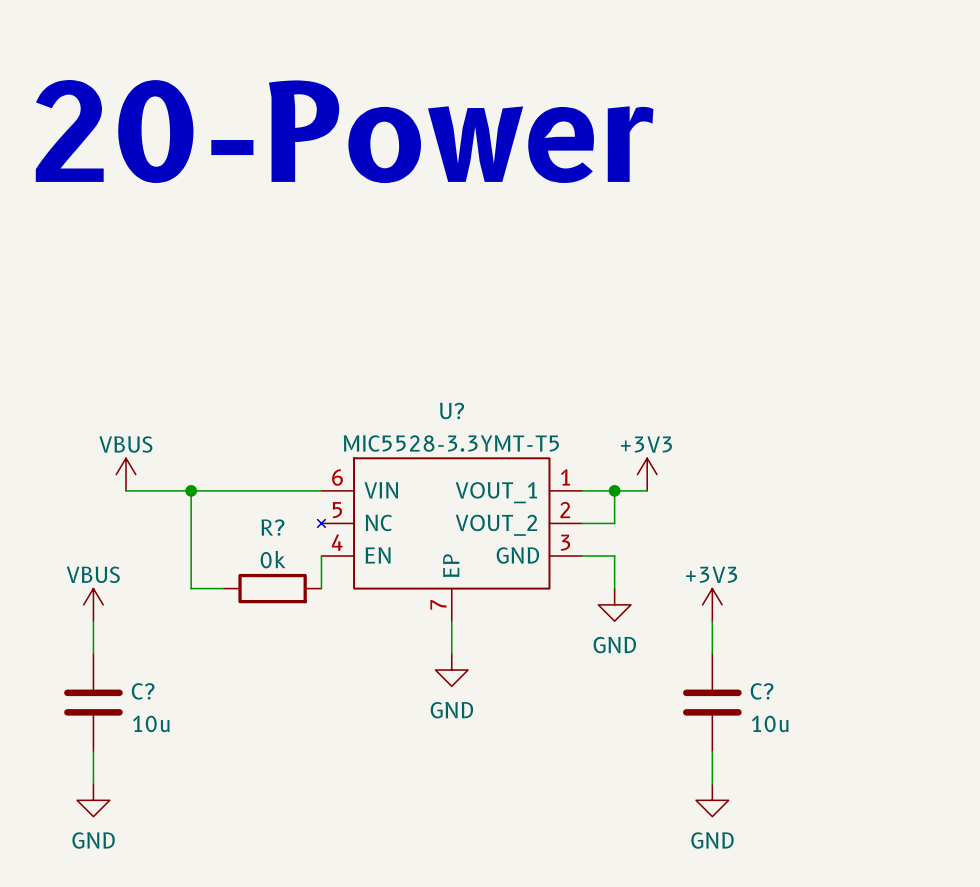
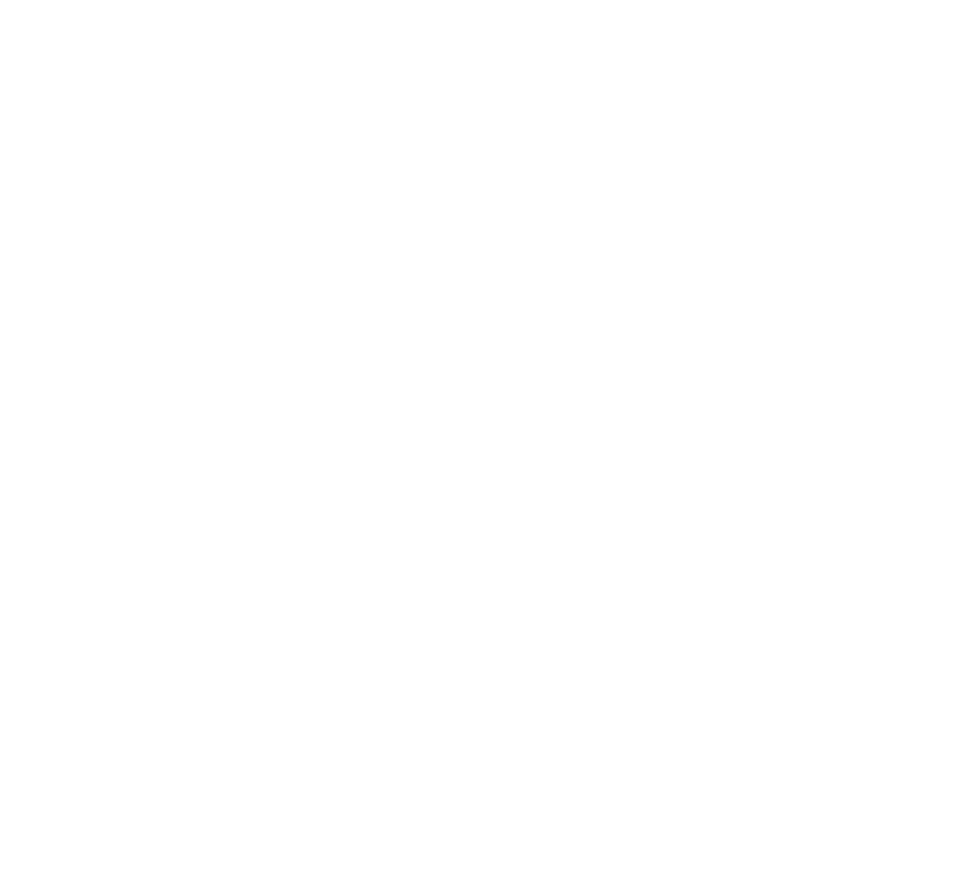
text: 20-Power (344, 131) -> none
power symbol: VBUS (126, 474) -> none
power symbol: +3V3 (647, 474) -> none
wire: (126, 490) (321, 490) -> none
wire: (191, 490) (191, 588) (223, 588) -> none
junction: (191, 490) -> none
wire: (582, 490) (647, 490) -> none
wire: (614, 490) (614, 523) (582, 523) -> none
junction: (614, 490) -> none
U?: MIC5528-3.3YMT-T5 (449, 539) -> none
wire: (321, 556) (321, 588) -> none
wire: (582, 556) (614, 556) (614, 588) -> none
R?: 0k (272, 588) -> none
power symbol: VBUS (93, 604) -> none
power symbol: GND (614, 604) -> none
power symbol: +3V3 (712, 604) -> none
wire: (93, 621) (93, 653) -> none
wire: (451, 621) (451, 653) -> none
wire: (712, 621) (712, 653) -> none
power symbol: GND (451, 670) -> none
C?: 10u (93, 702) -> none
C?: 10u (712, 702) -> none
wire: (93, 751) (93, 784) -> none
wire: (712, 751) (712, 784) -> none
power symbol: GND (93, 800) -> none
power symbol: GND (712, 800) -> none

